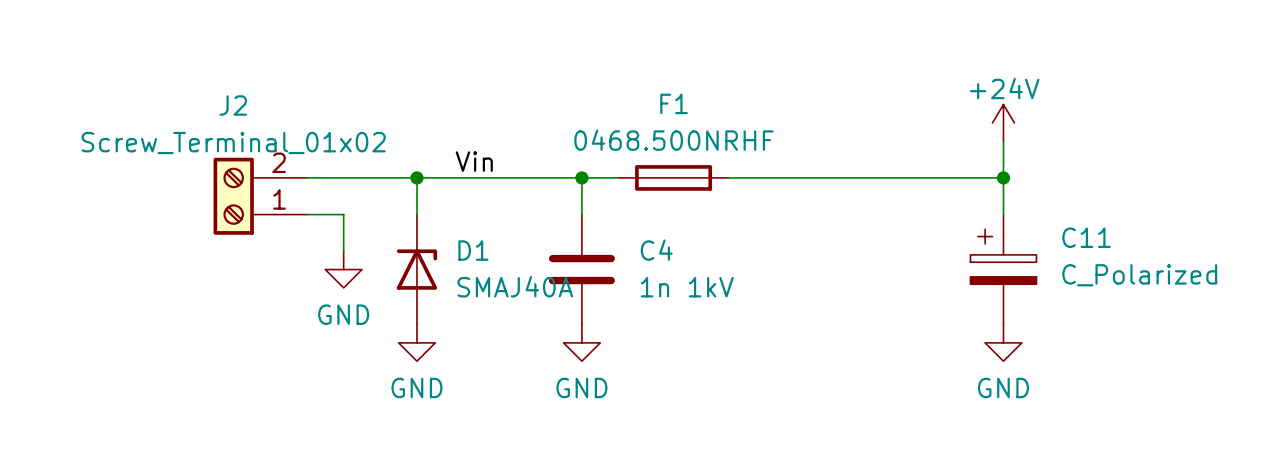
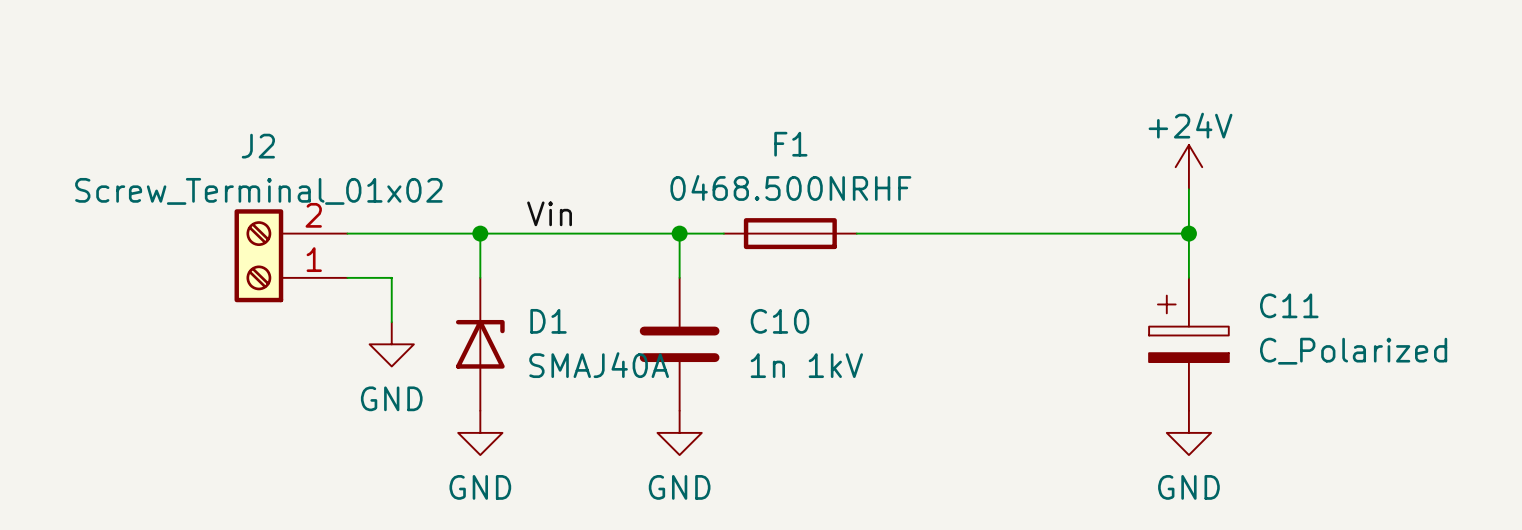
C4 name: C4 (656, 250) -> C10 (779, 321)

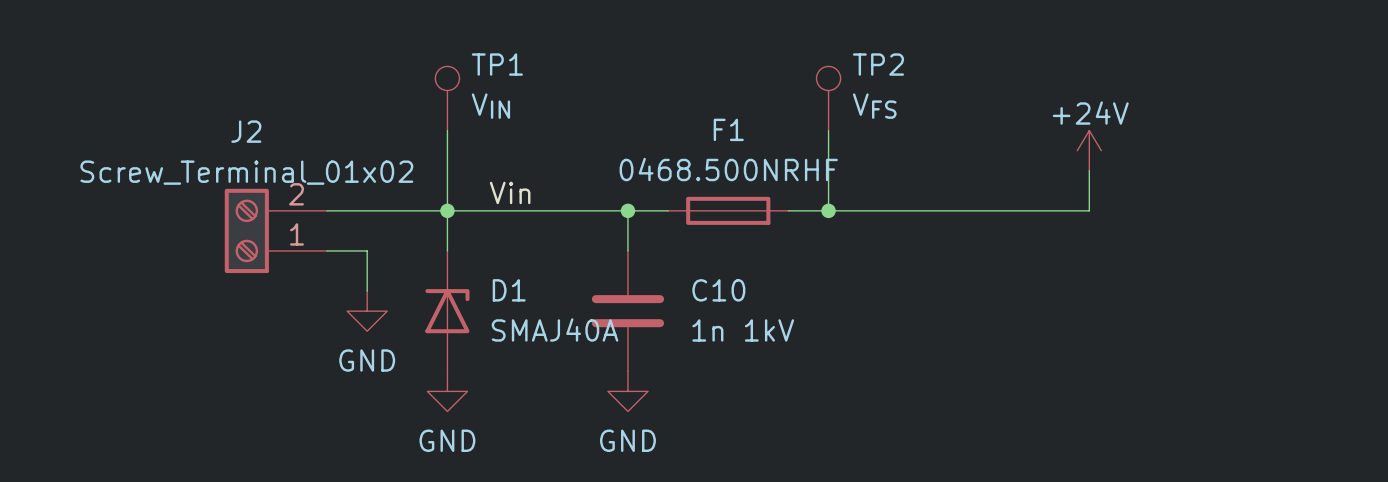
TP1: none -> VIN (447, 98)
TP2: none -> VFS (828, 98)
wire: none -> (447, 130) (447, 210)
wire: none -> (828, 130) (828, 210)
junction: none -> (828, 210)
wire: (1188, 233) (1188, 277) -> none
junction: (1188, 233) -> none
C11: C_Polarized (1188, 344) -> none
power symbol: GND (1188, 432) -> none

